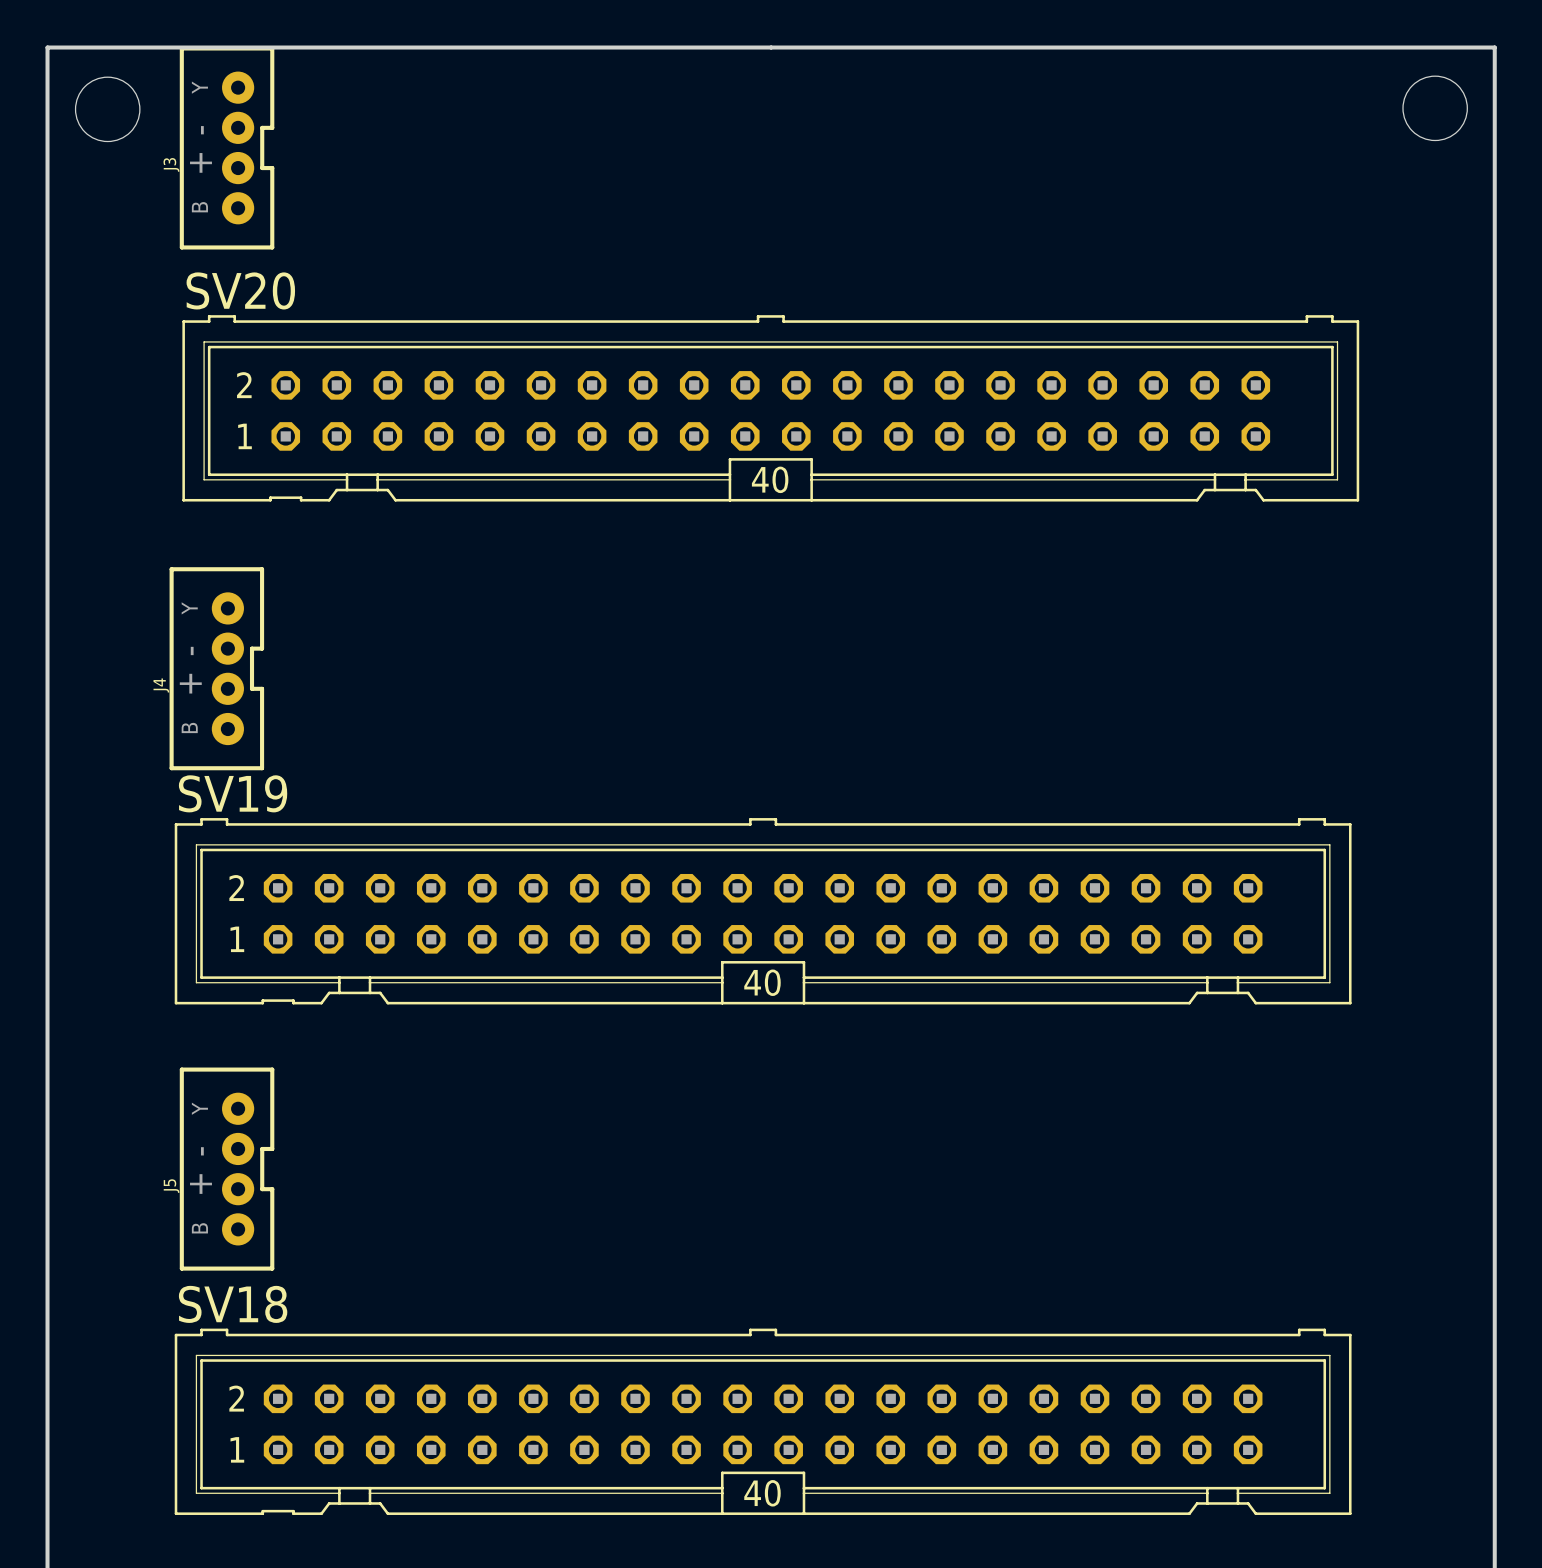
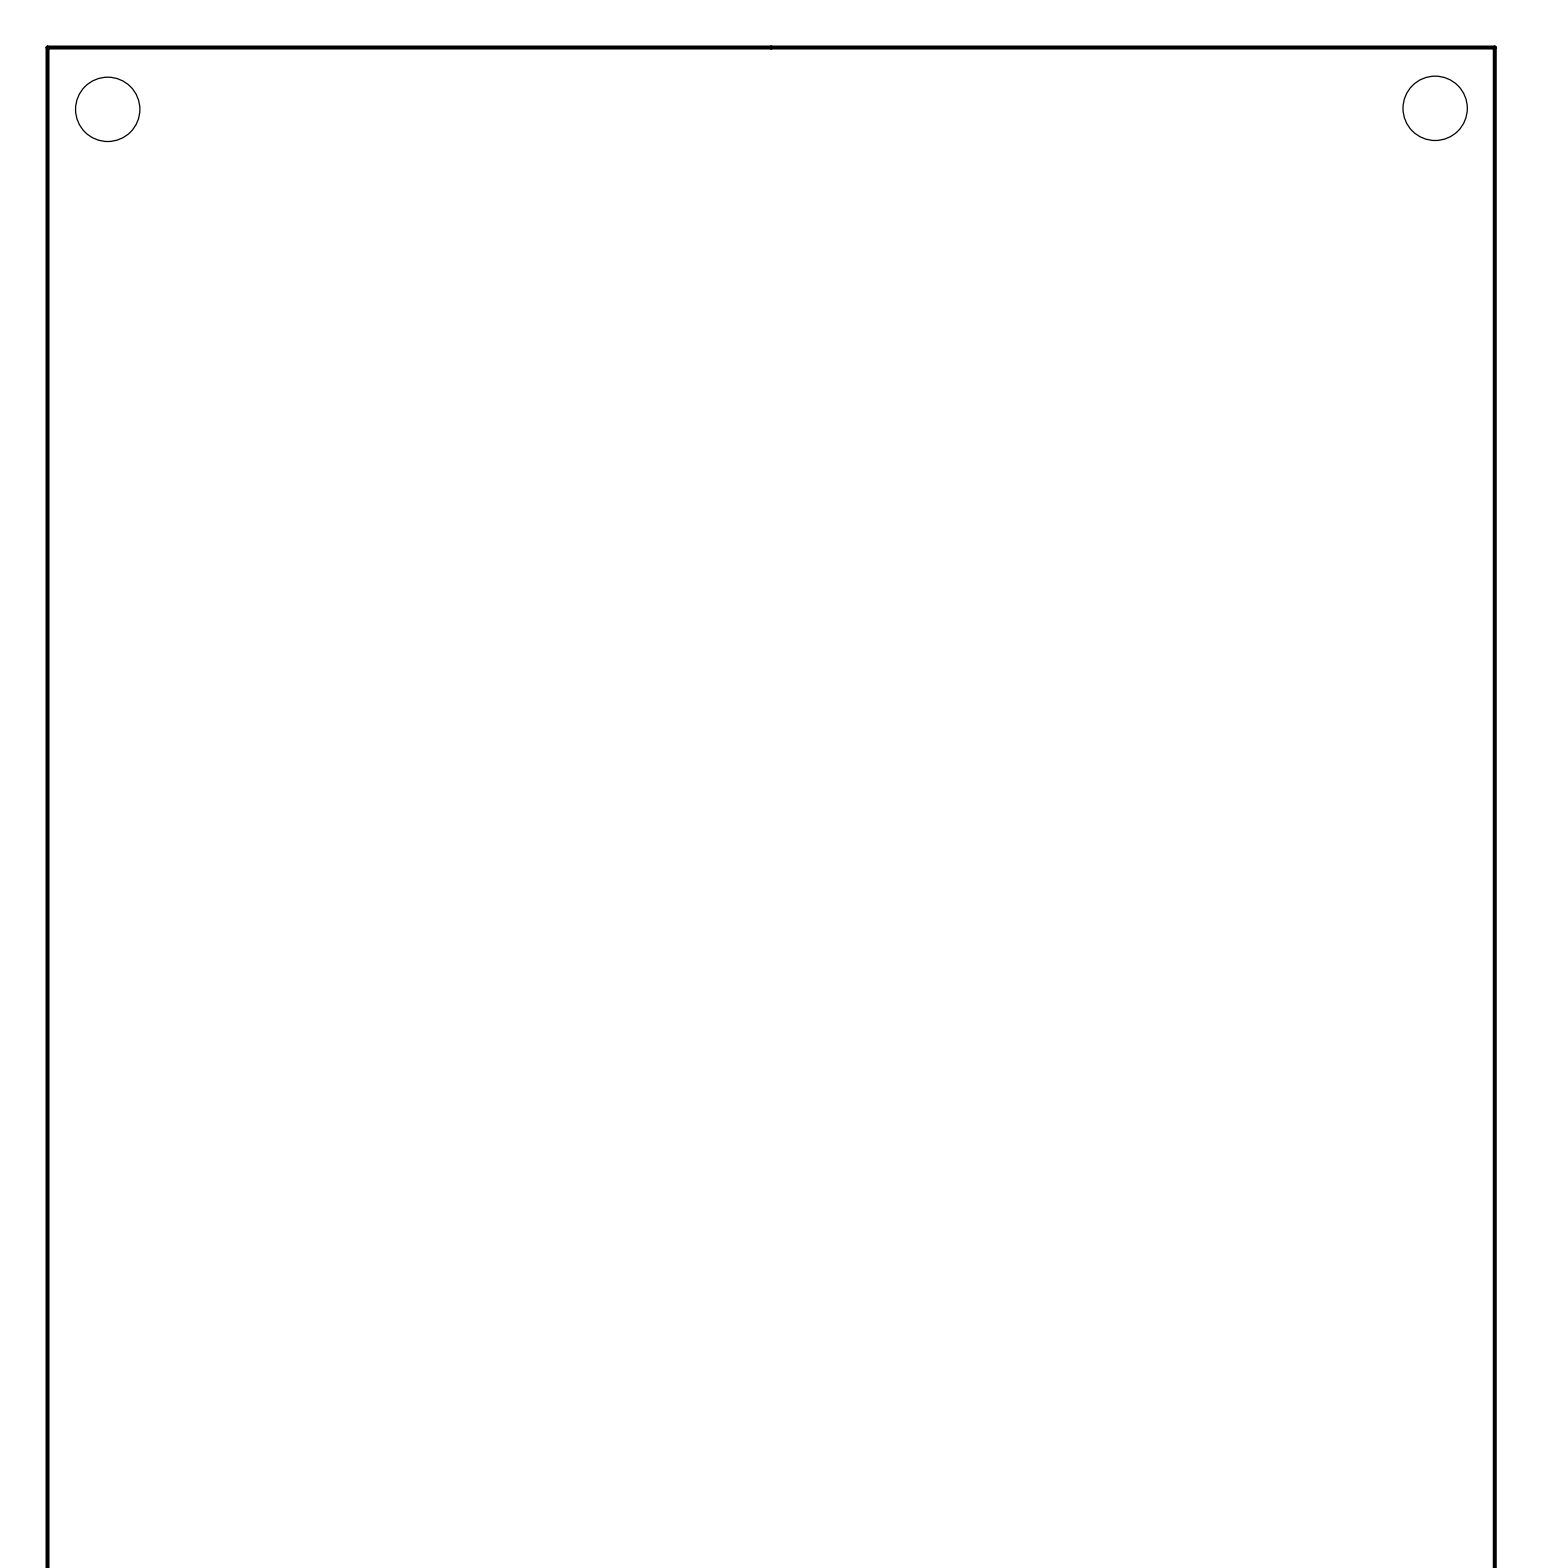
J3: (227, 147) -> none
SV20: (770, 408) -> none
J4: (216, 668) -> none
SV19: (763, 911) -> none
J5: (227, 1169) -> none
SV18: (763, 1421) -> none

